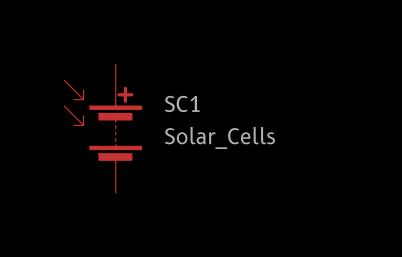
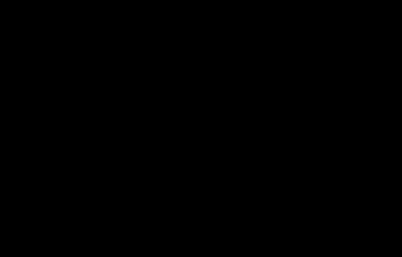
SC1: Solar_Cells (102, 128) -> none

